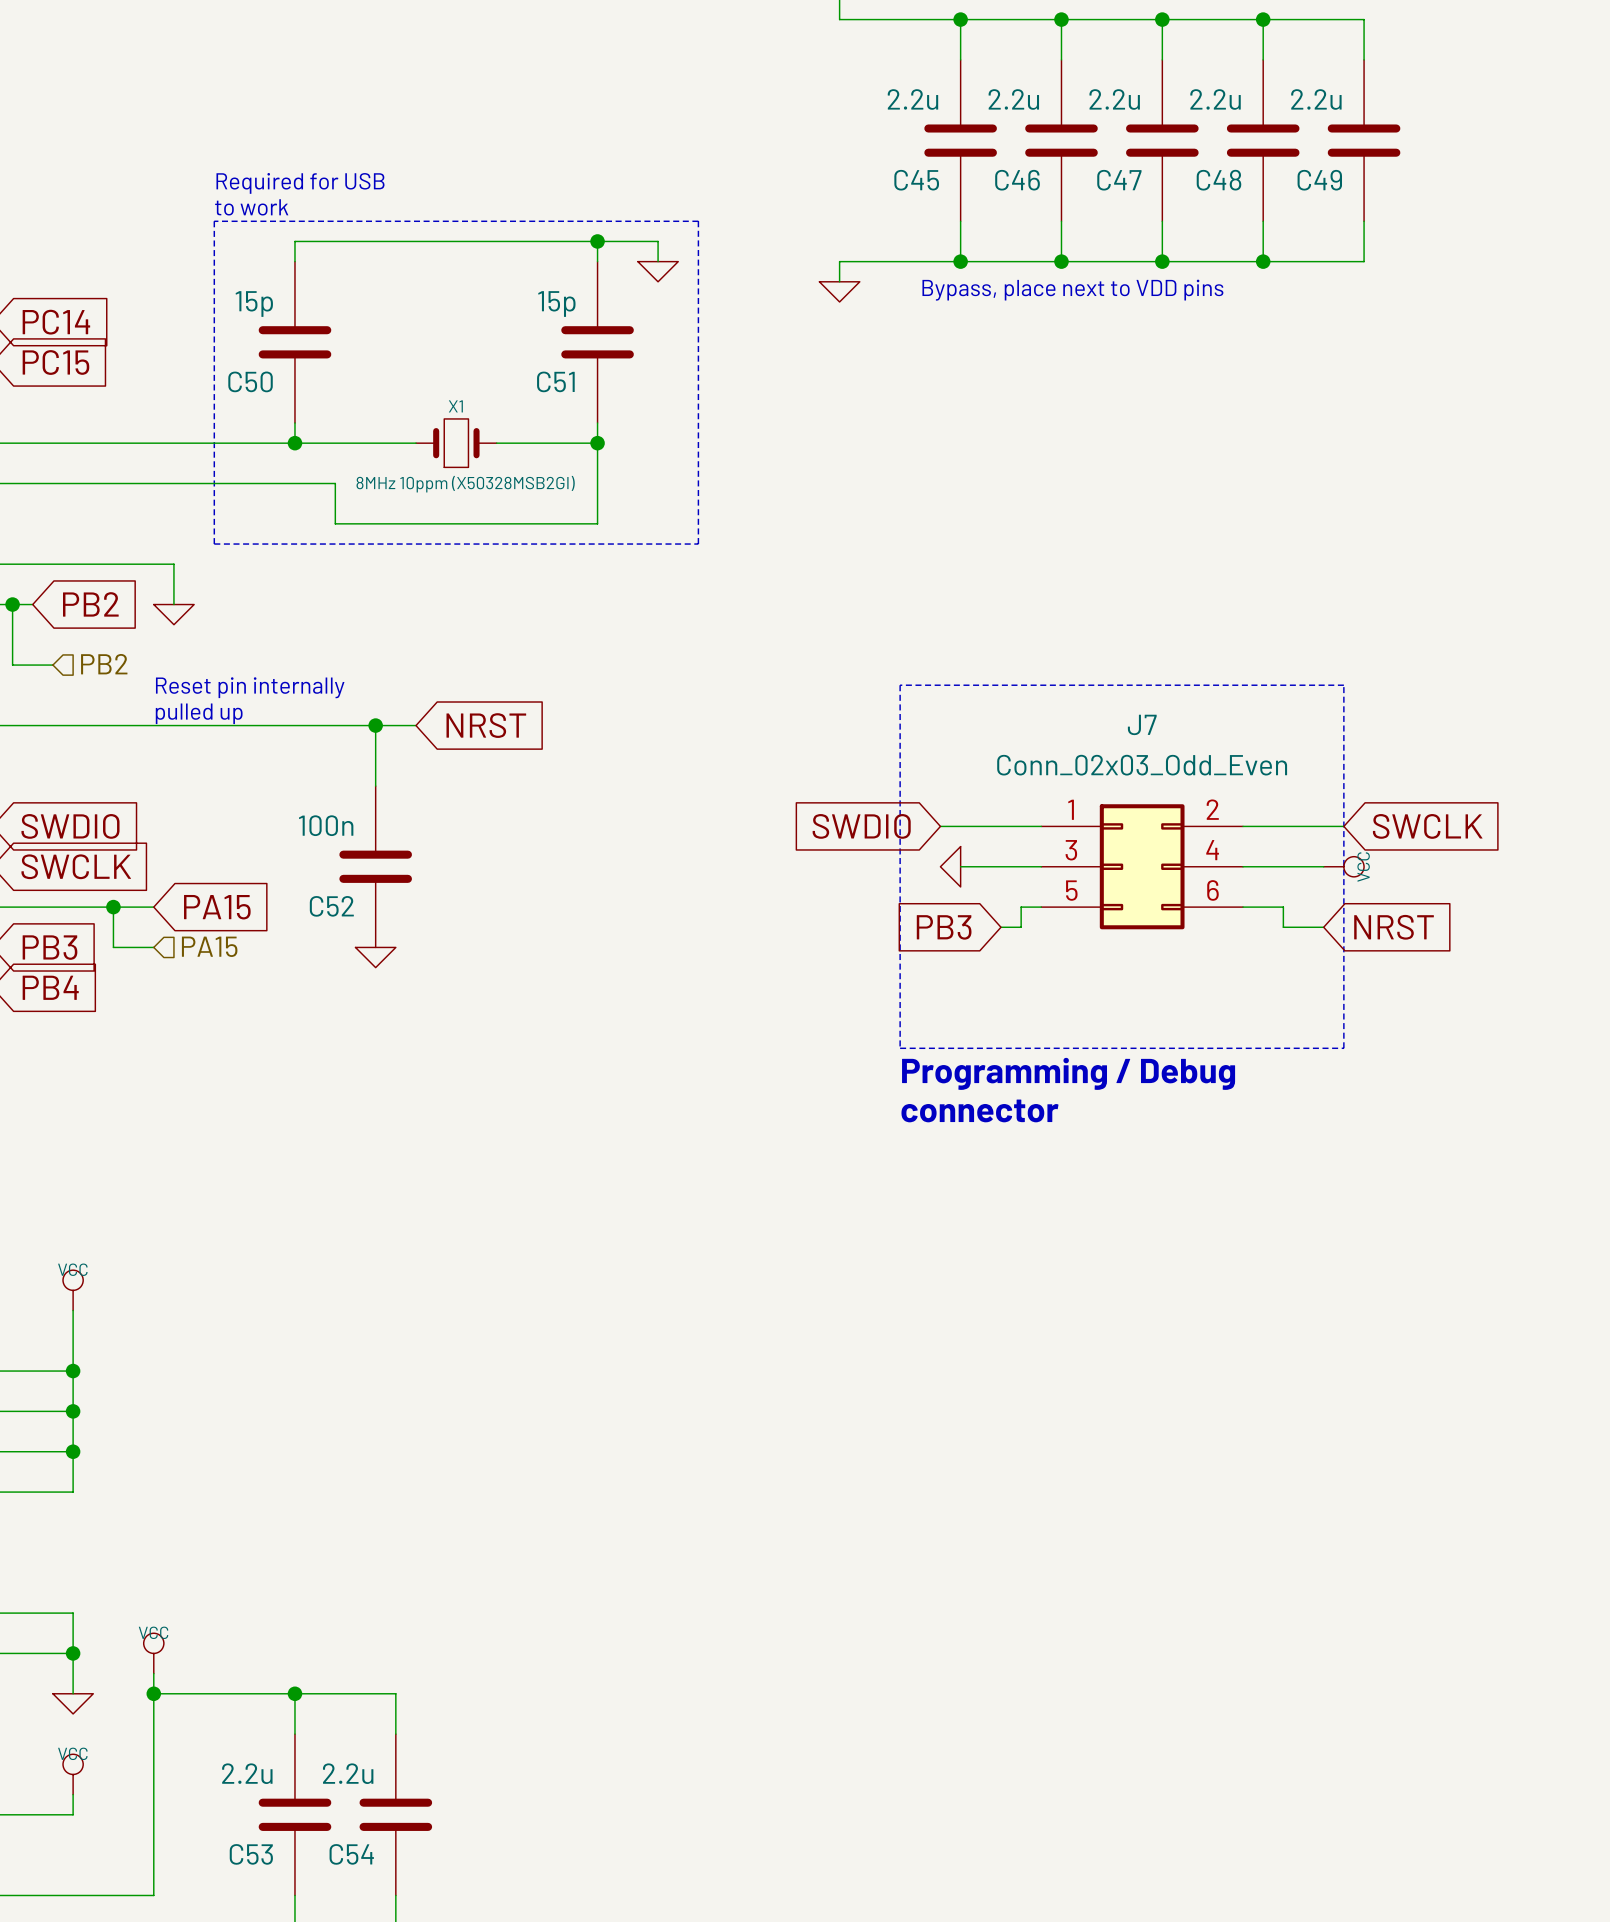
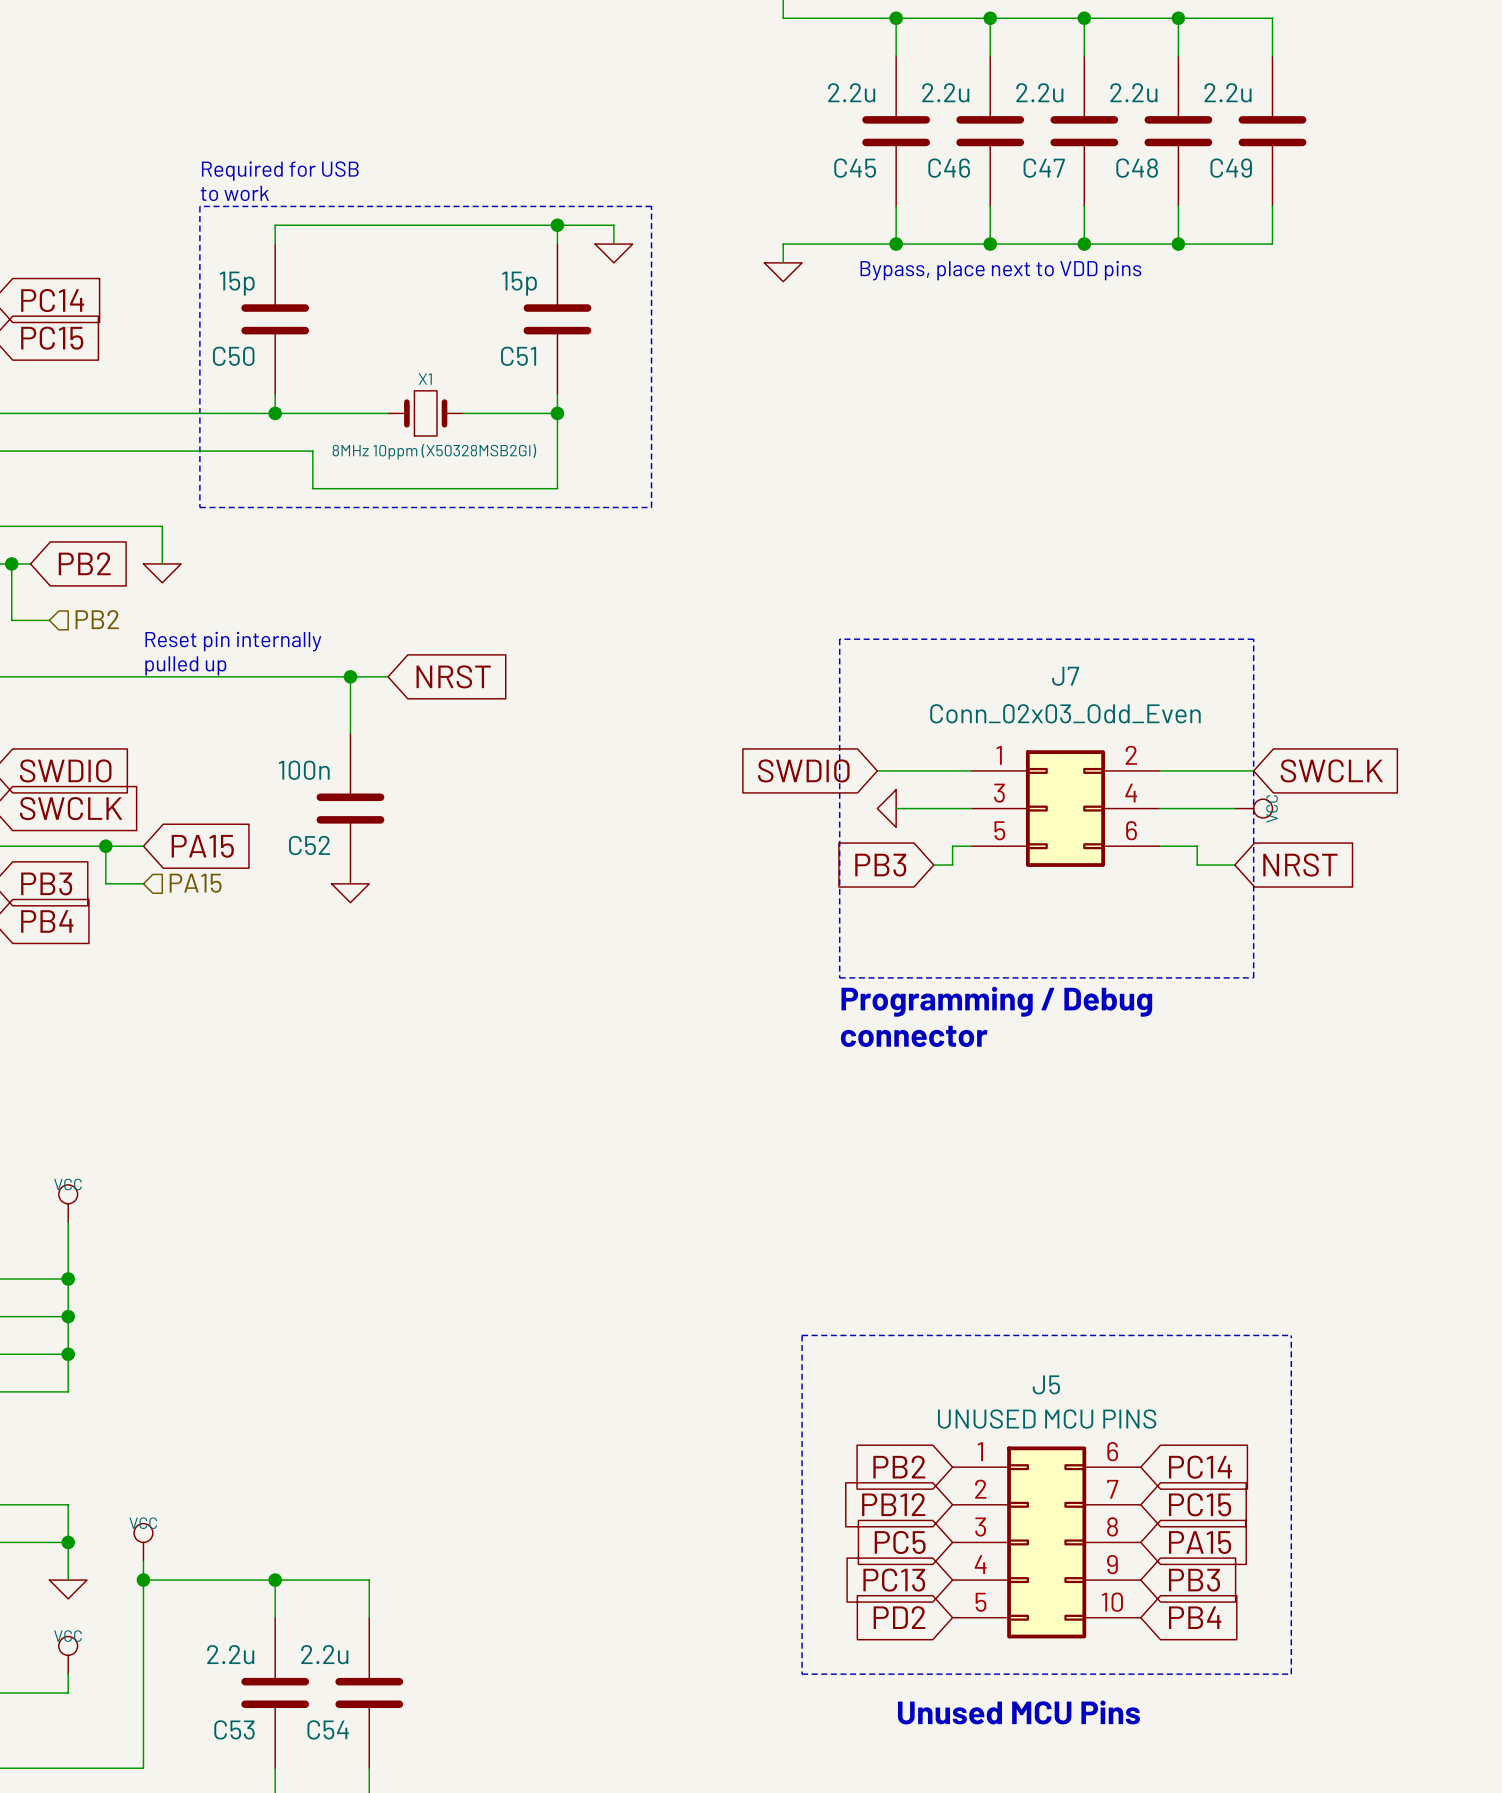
line: none -> (802, 1335) (1291, 1335) (1291, 1674) (802, 1674) (802, 1335)
global label: none -> PB2 (899, 1467)
global label: none -> PC14 (1200, 1467)
global label: none -> PB12 (893, 1504)
global label: none -> PC15 (1200, 1504)
global label: none -> PC5 (900, 1542)
J5: none -> UNUSED MCU PINS (1046, 1542)
global label: none -> PA15 (1200, 1542)
global label: none -> PC13 (894, 1580)
global label: none -> PB3 (1194, 1580)
global label: none -> PD2 (899, 1617)
global label: none -> PB4 (1195, 1617)
text: none -> Unused MCU Pins (1018, 1712)

